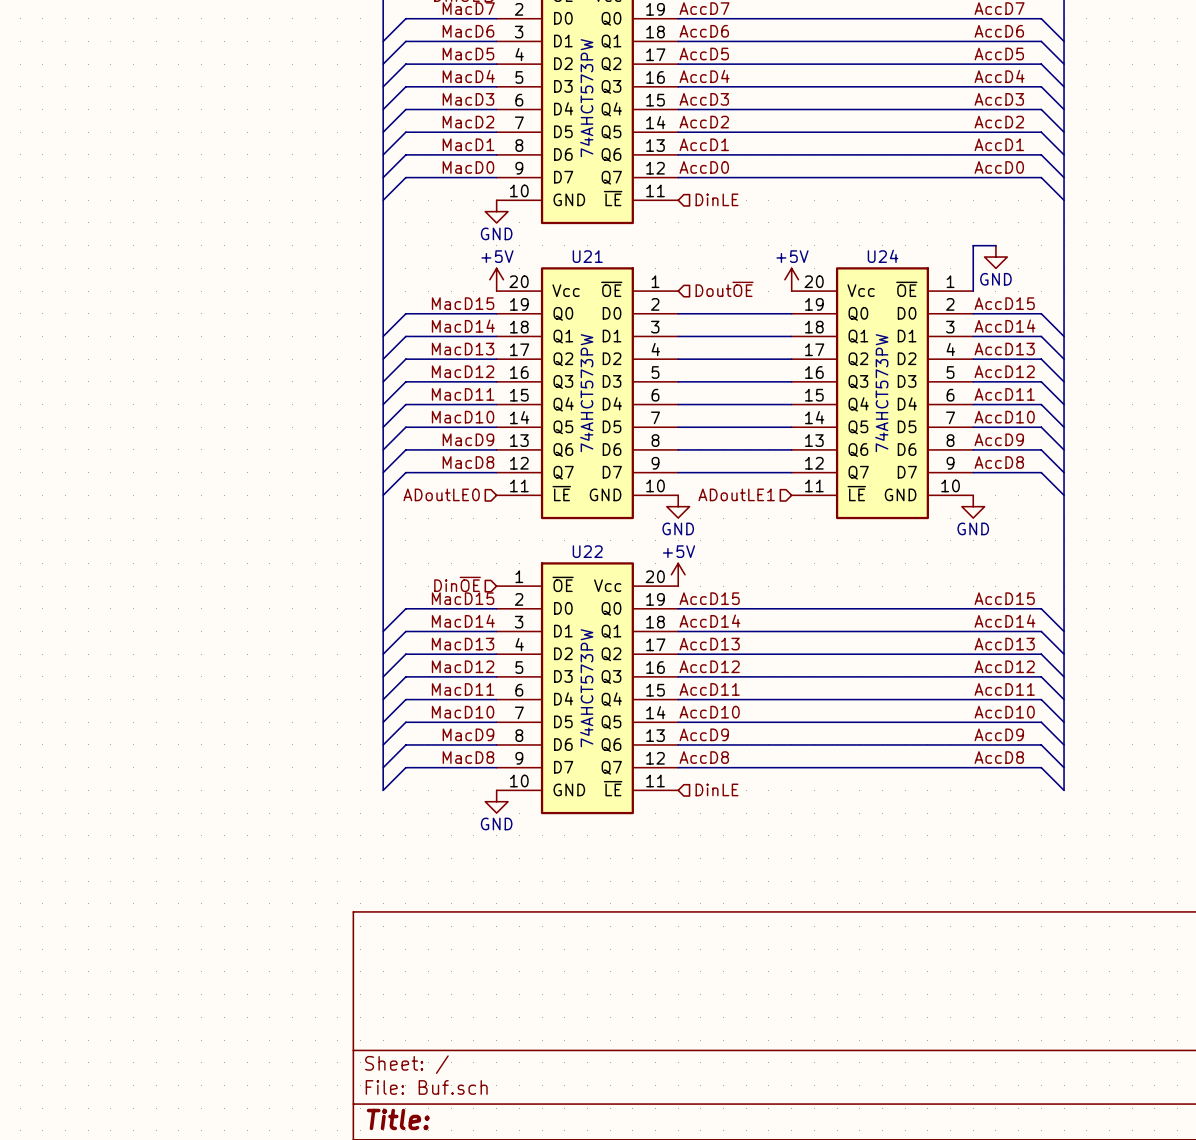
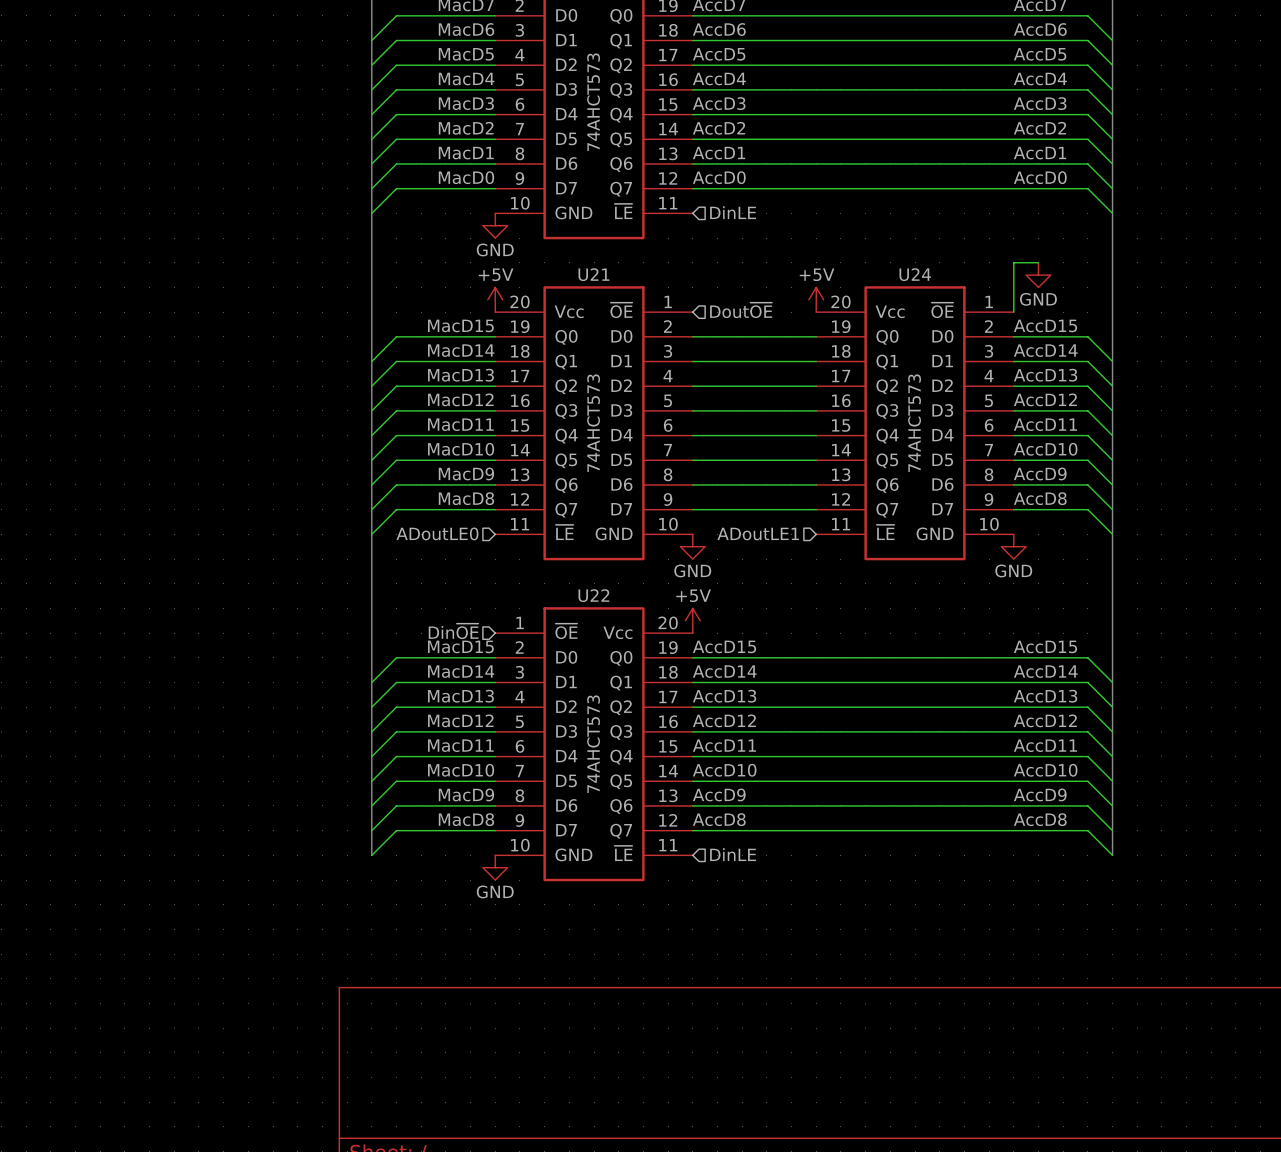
part value: 74AHCT573PW (586, 98) -> 74AHCT573 (593, 102)
U21 value: 74AHCT573PW (586, 393) -> 74AHCT573 (593, 423)
U24 value: 74AHCT573PW (881, 393) -> 74AHCT573 (914, 423)
U22 value: 74AHCT573PW (586, 688) -> 74AHCT573 (593, 744)

